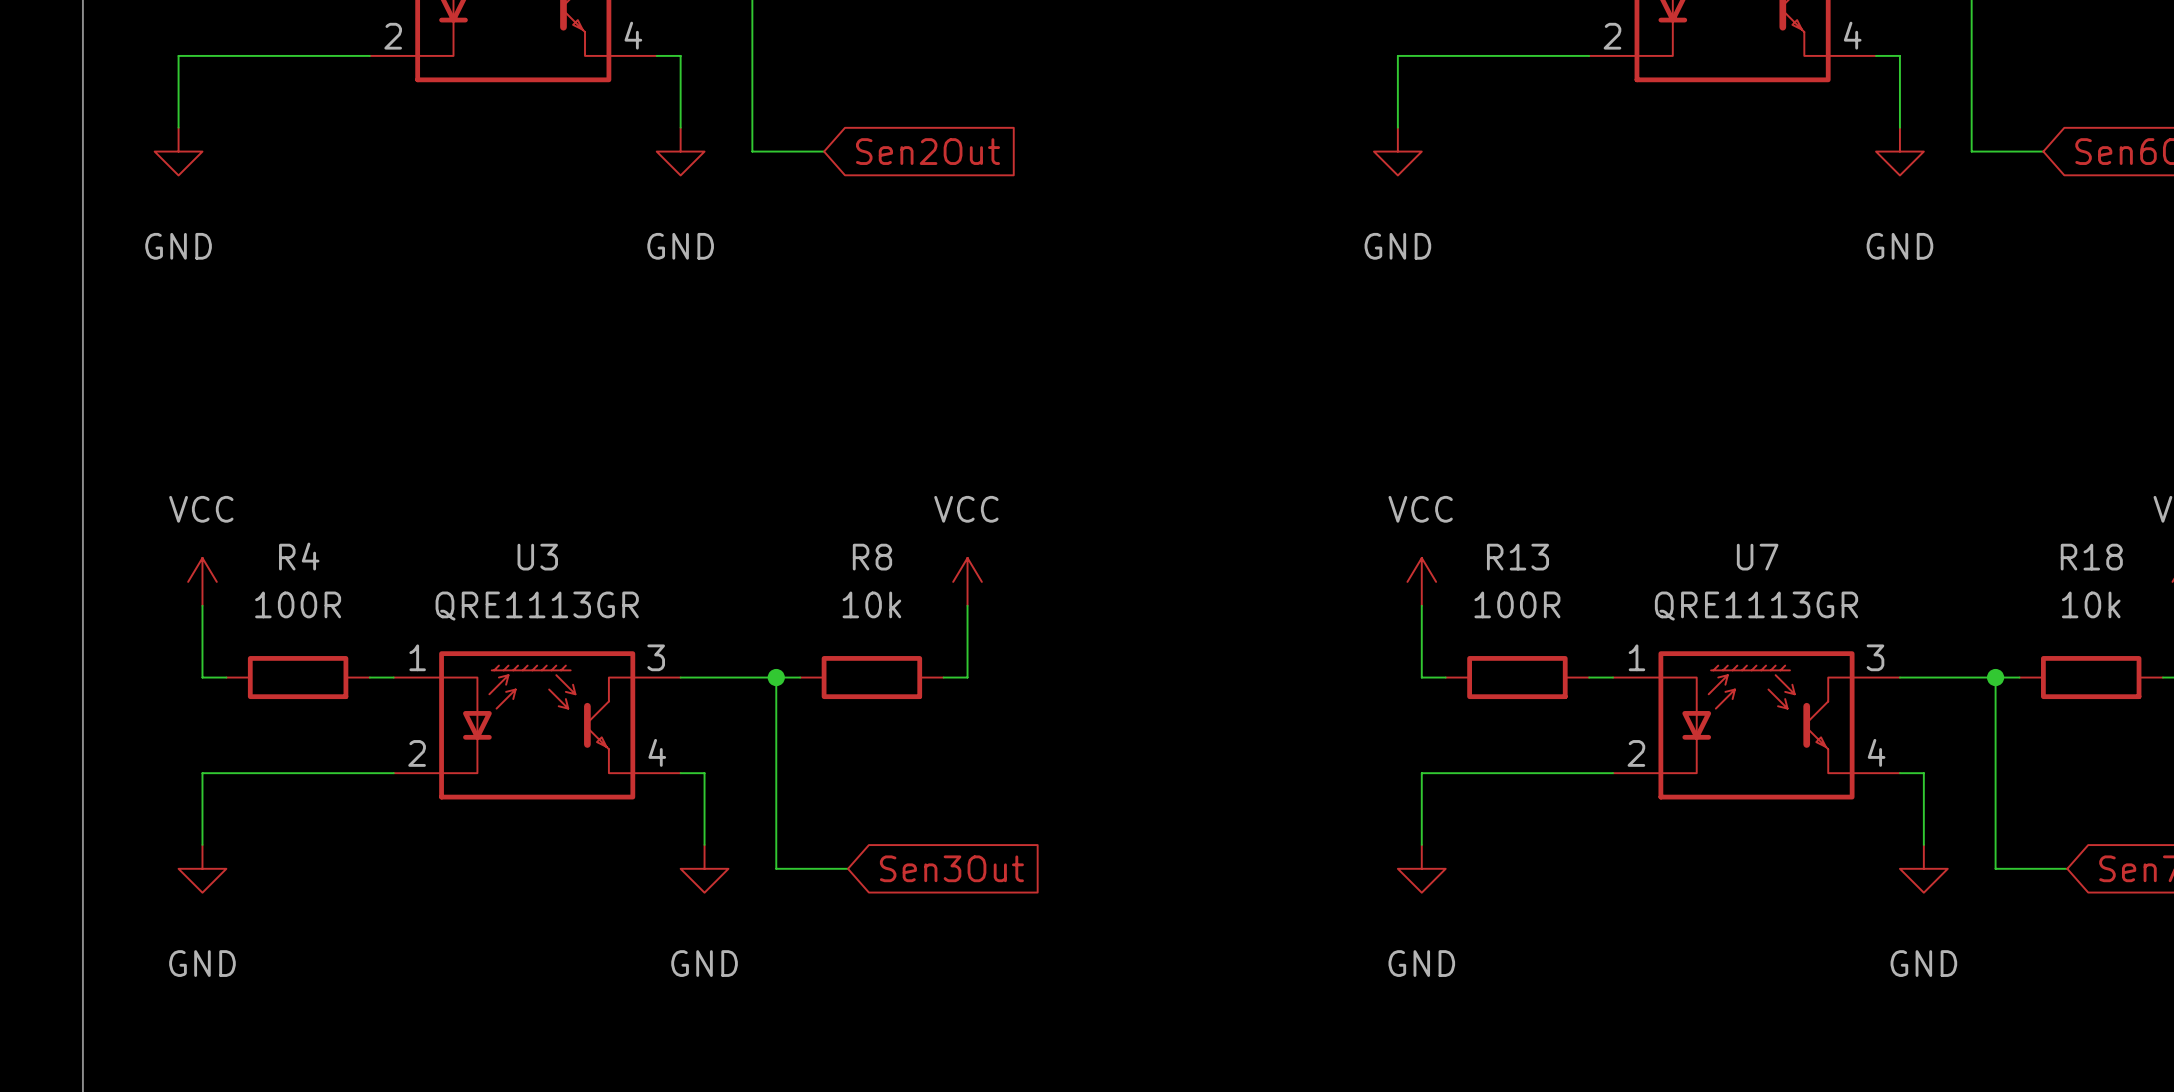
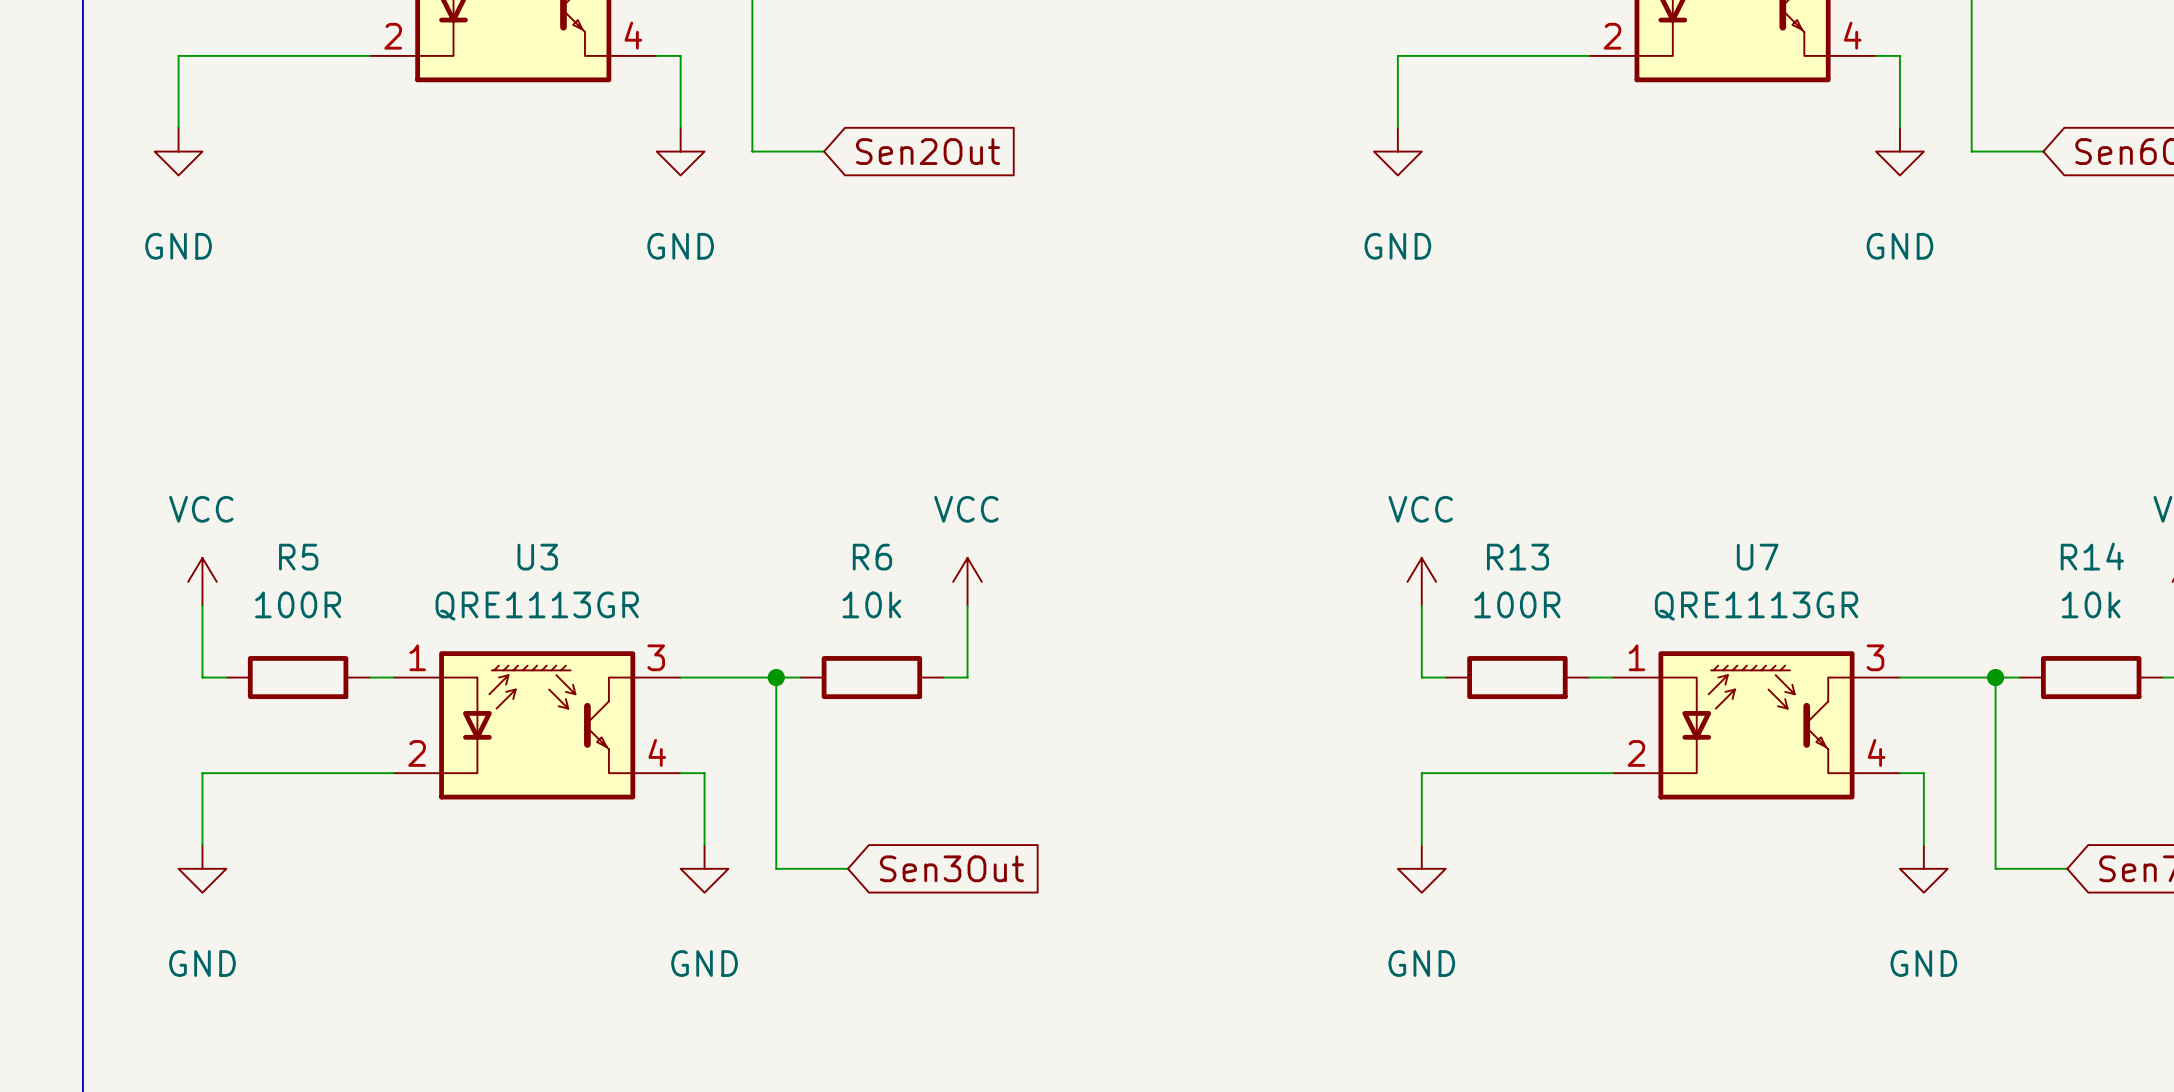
R4 name: R4 (299, 556) -> R5 (298, 557)
R8 name: R8 (872, 557) -> R6 (872, 557)
R18 name: R18 (2091, 557) -> R14 (2092, 556)

